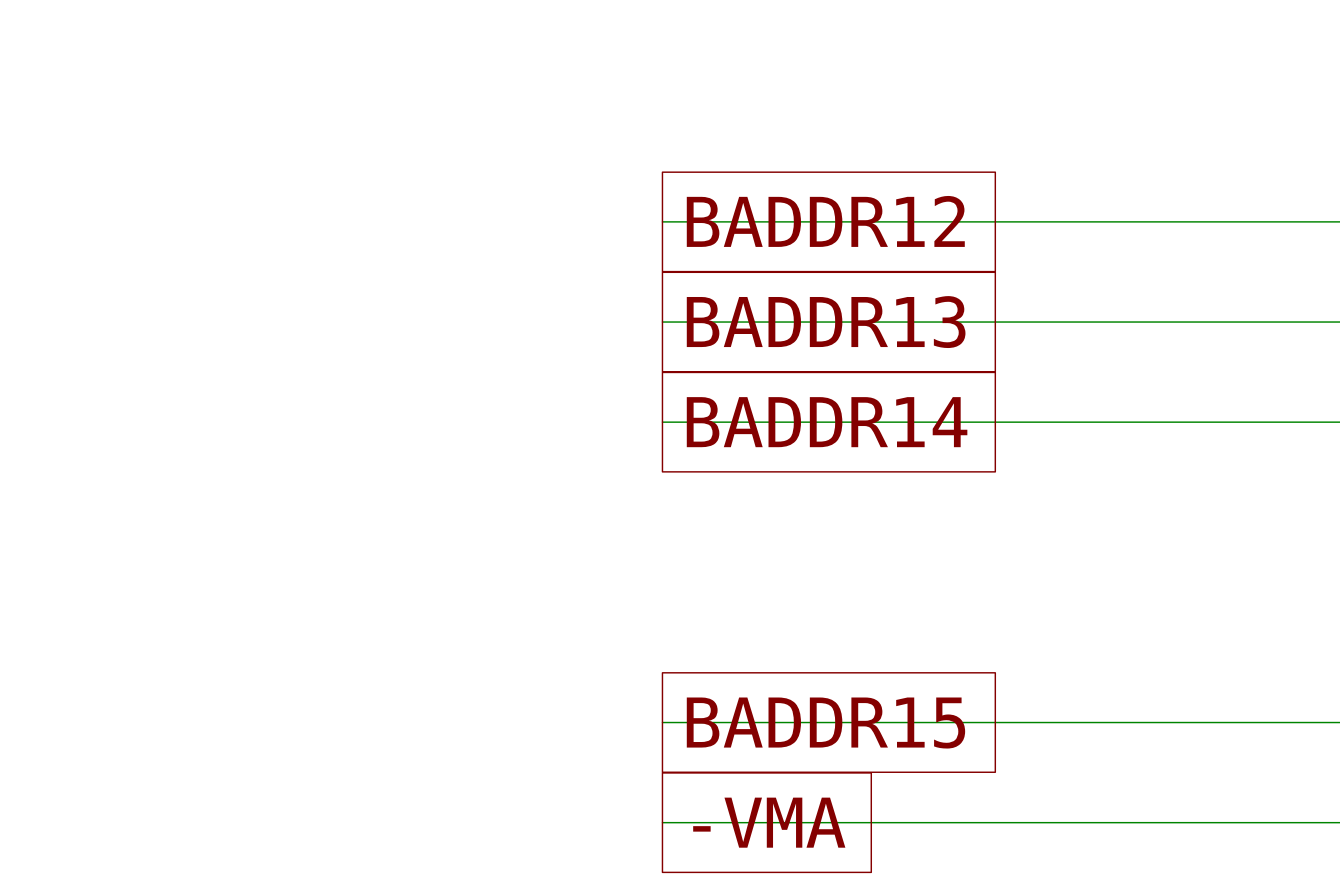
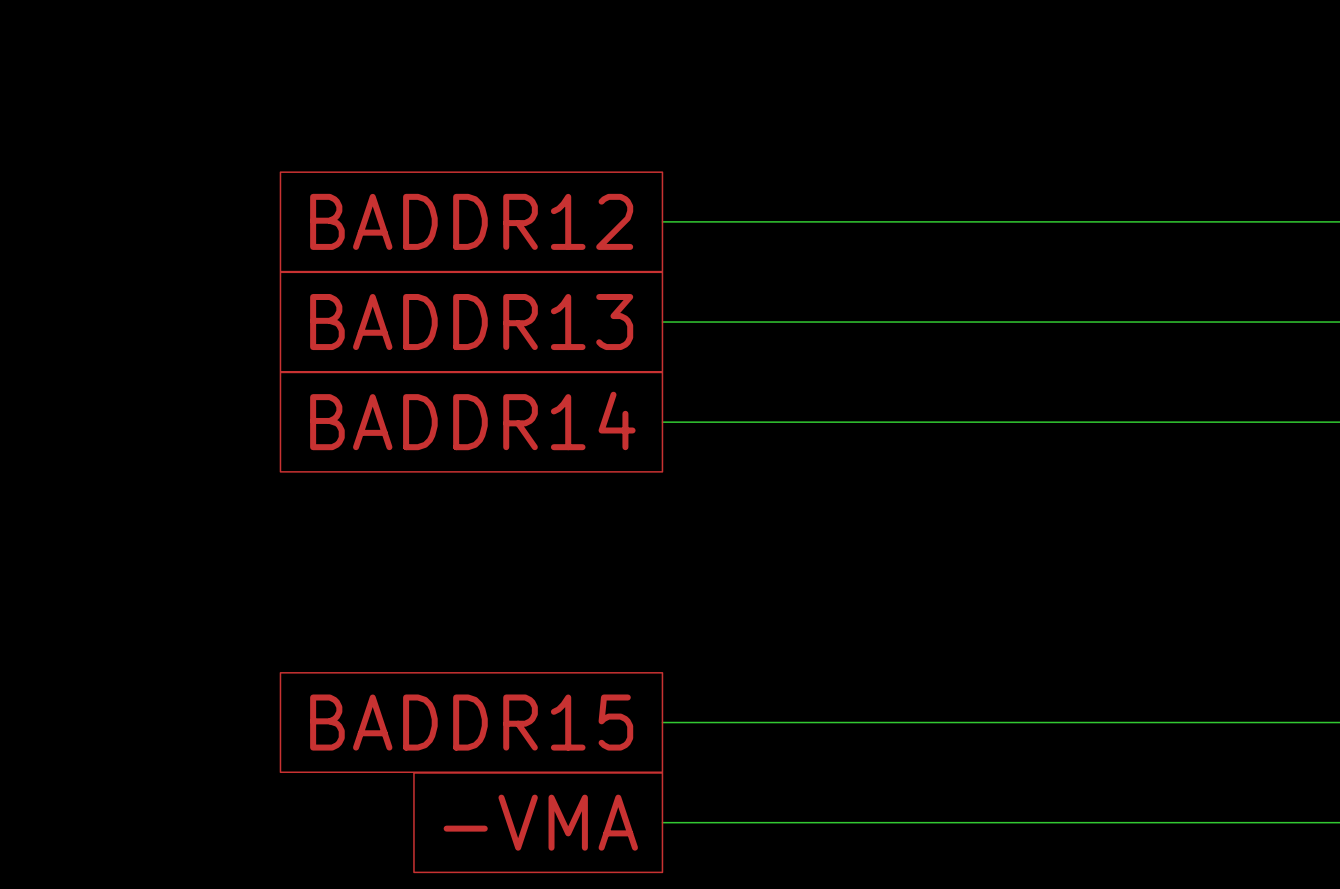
global label rotation: 0° (825, 221) -> 180° (471, 221)
global label rotation: 0° (826, 322) -> 180° (471, 322)
global label rotation: 0° (827, 422) -> 180° (472, 420)
global label rotation: 0° (825, 723) -> 180° (471, 722)
global label rotation: 0° (769, 822) -> 180° (540, 822)

